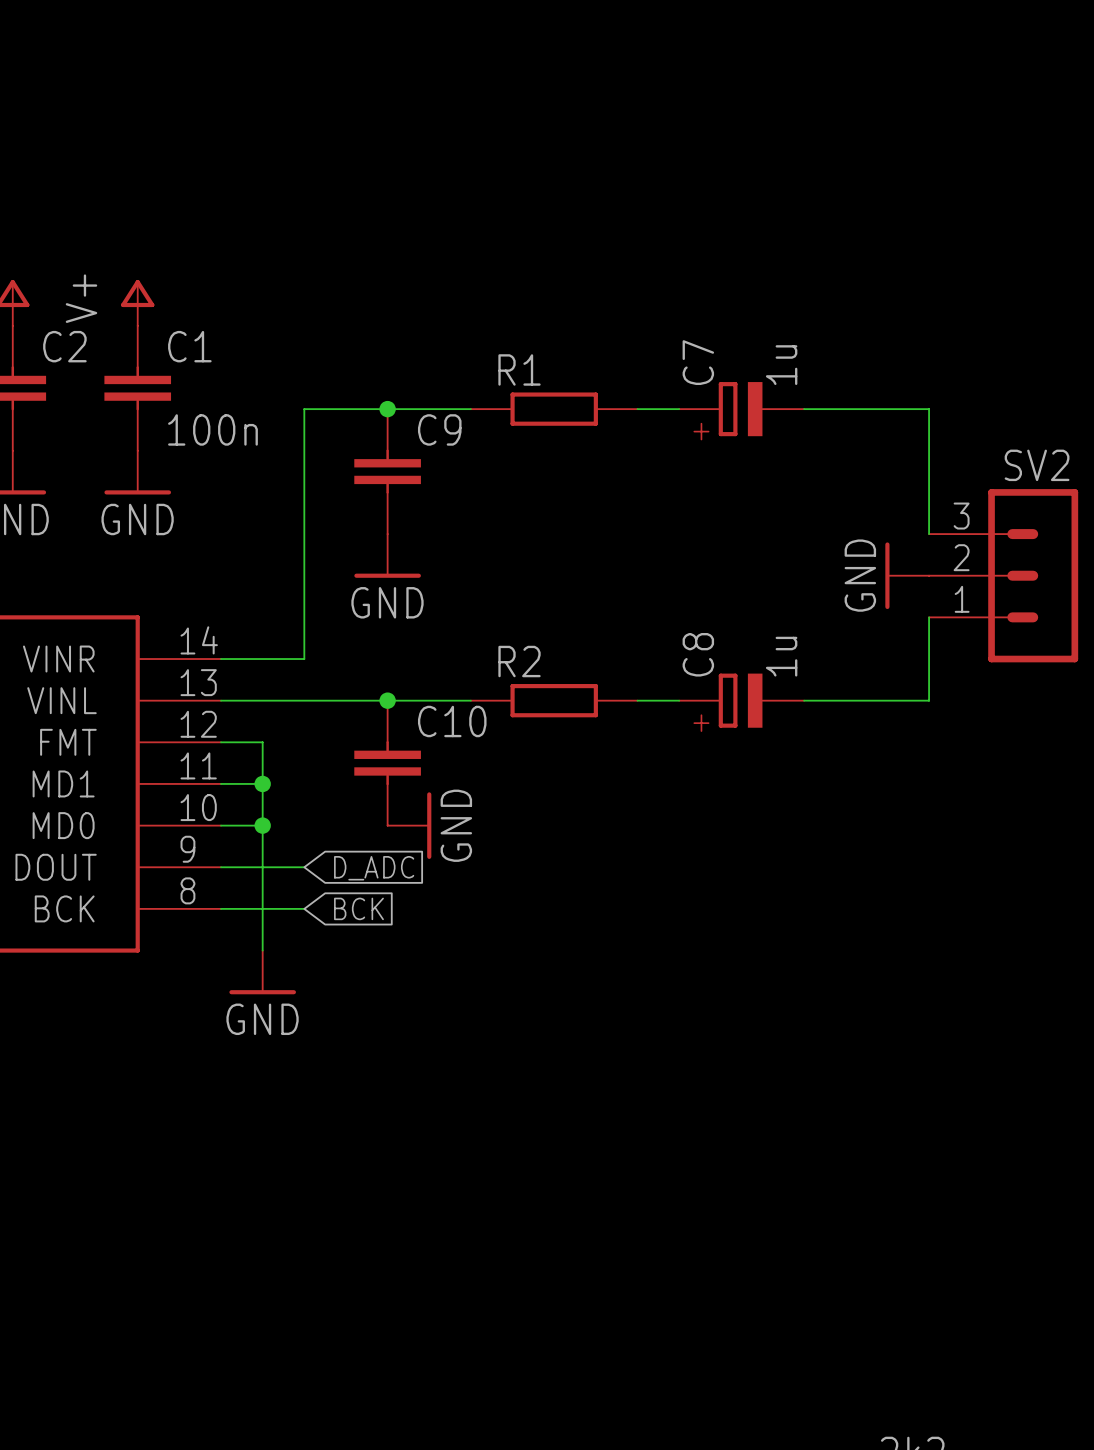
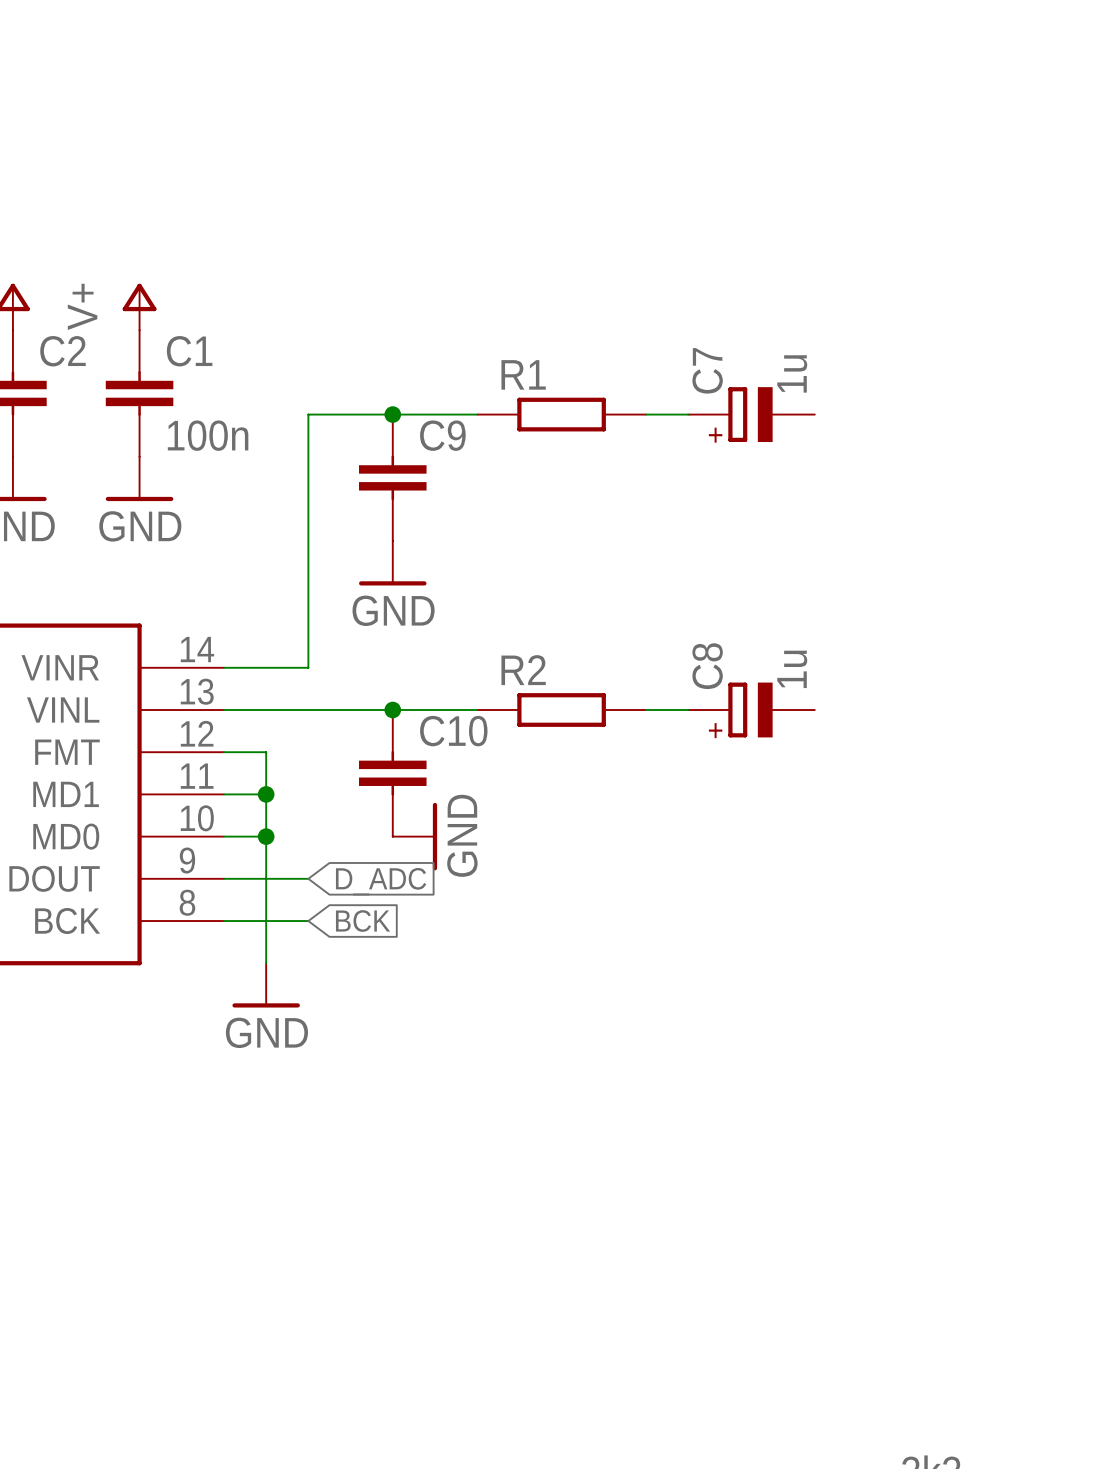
wire: (804, 409) (929, 409) (929, 534) -> none
power symbol: GND (907, 575) -> none
SV2: (1003, 575) -> none
wire: (929, 617) (929, 700) (804, 700) -> none

